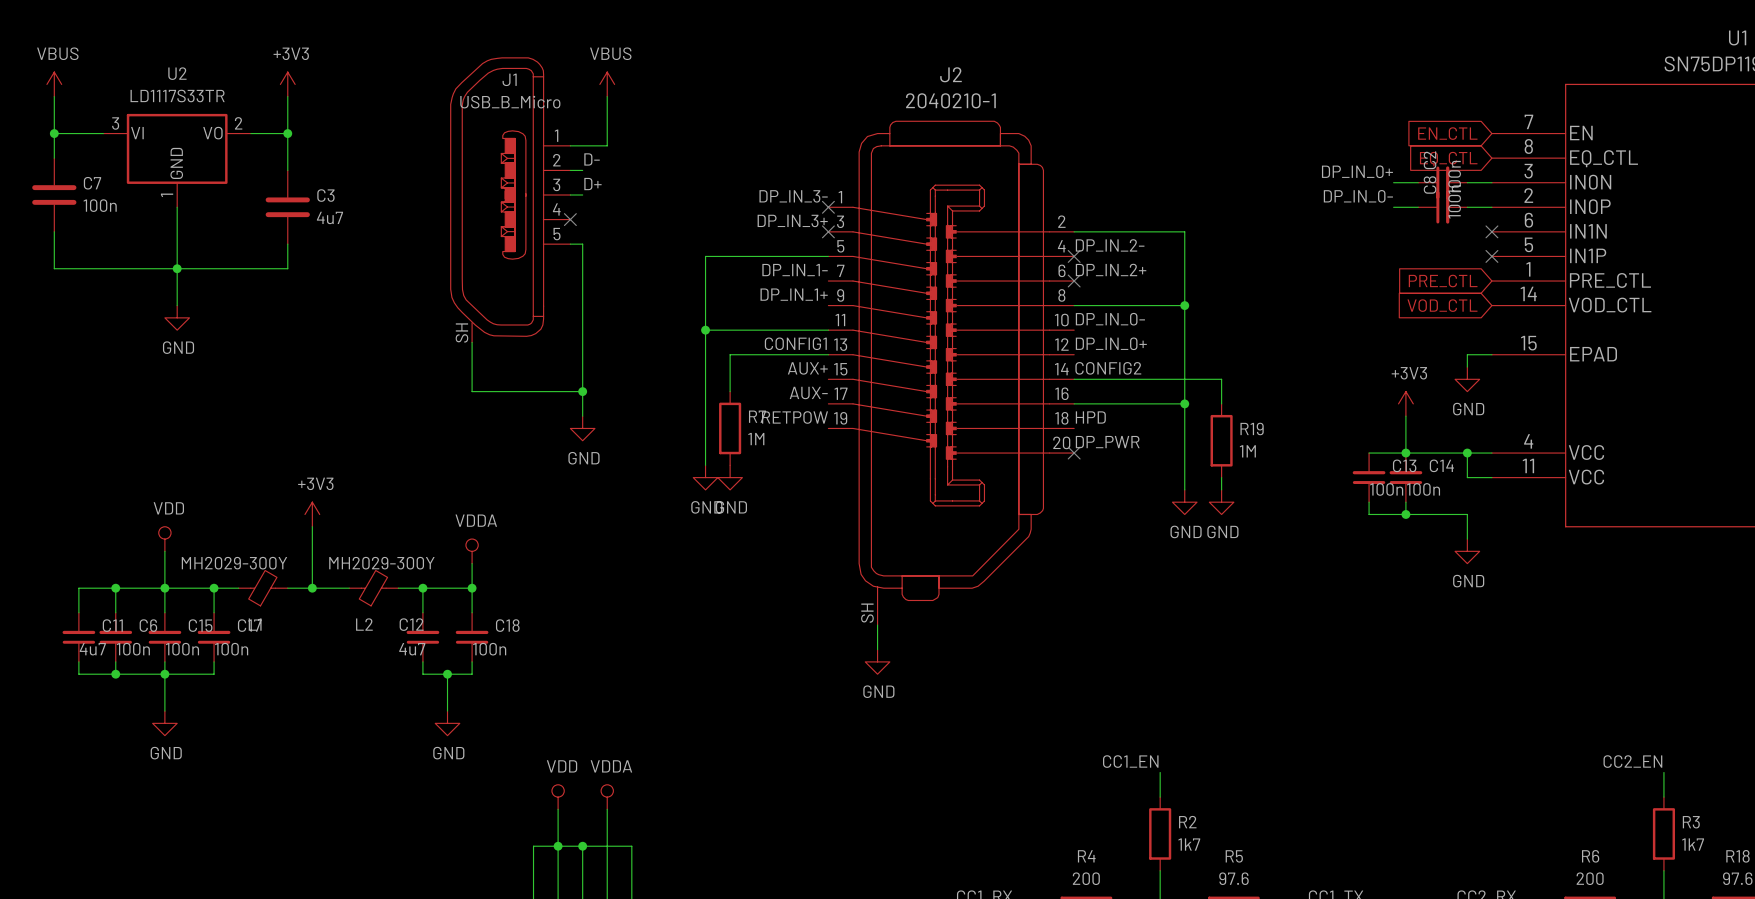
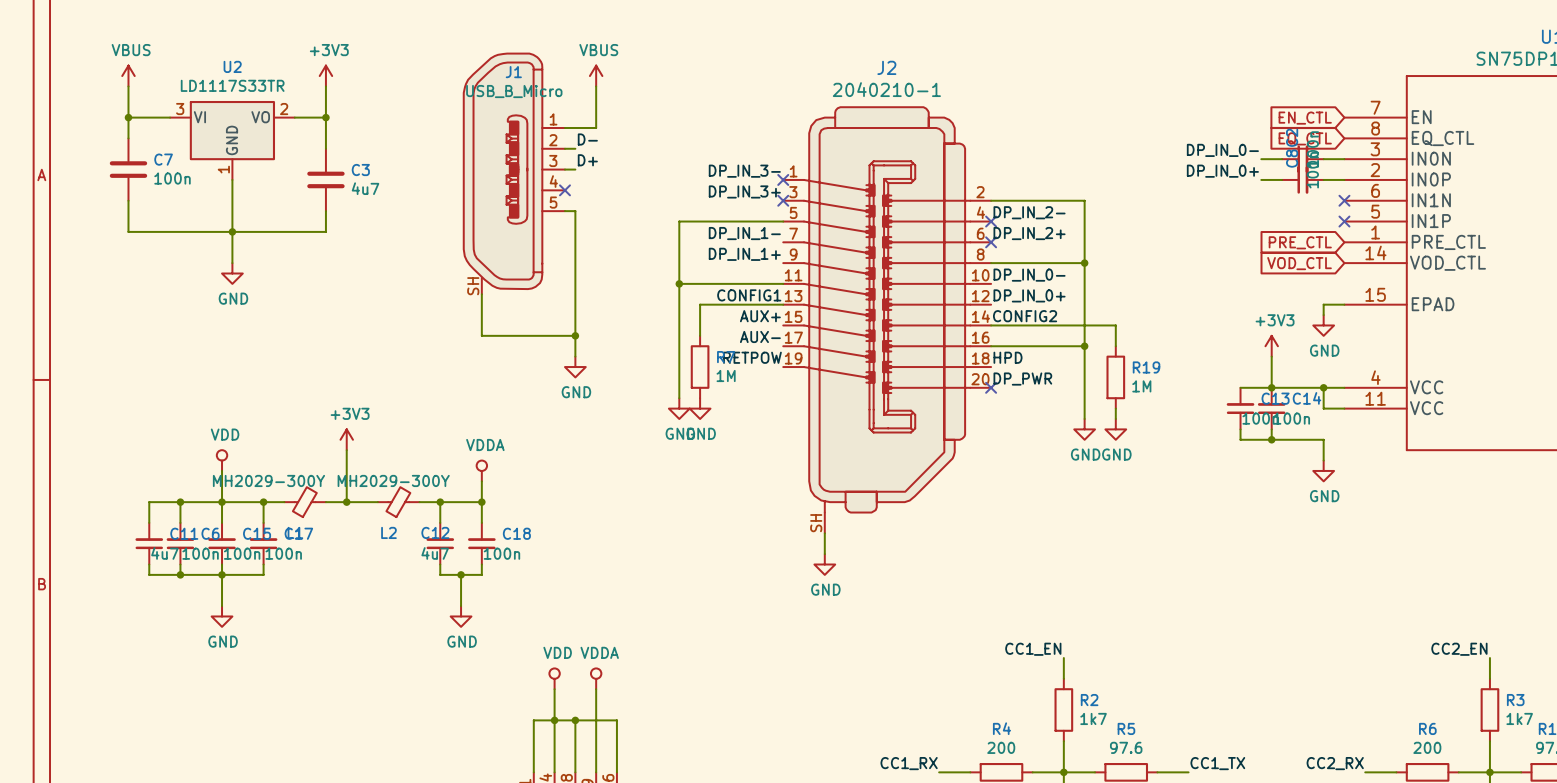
label: DP_IN_0+ (1357, 171) -> DP_IN_0- (1222, 150)
label: DP_IN_0- (1358, 196) -> DP_IN_0+ (1222, 171)

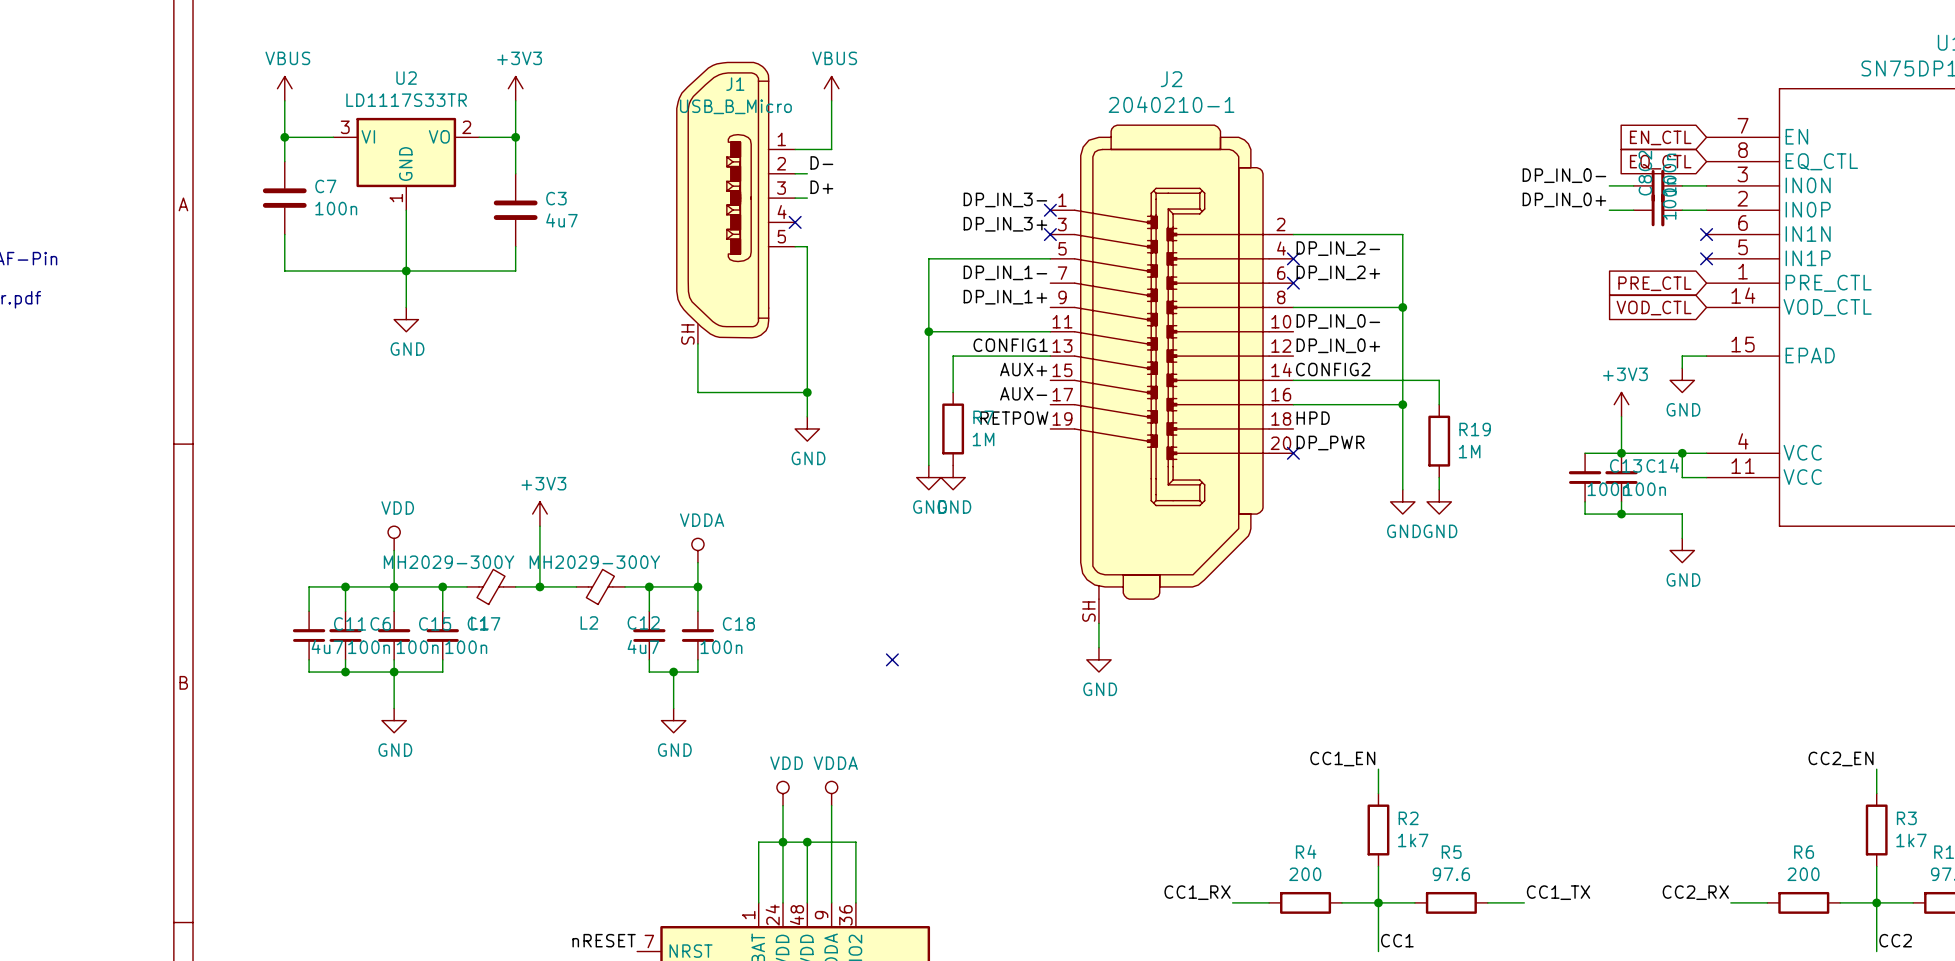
no-connect mark: none -> (892, 659)

